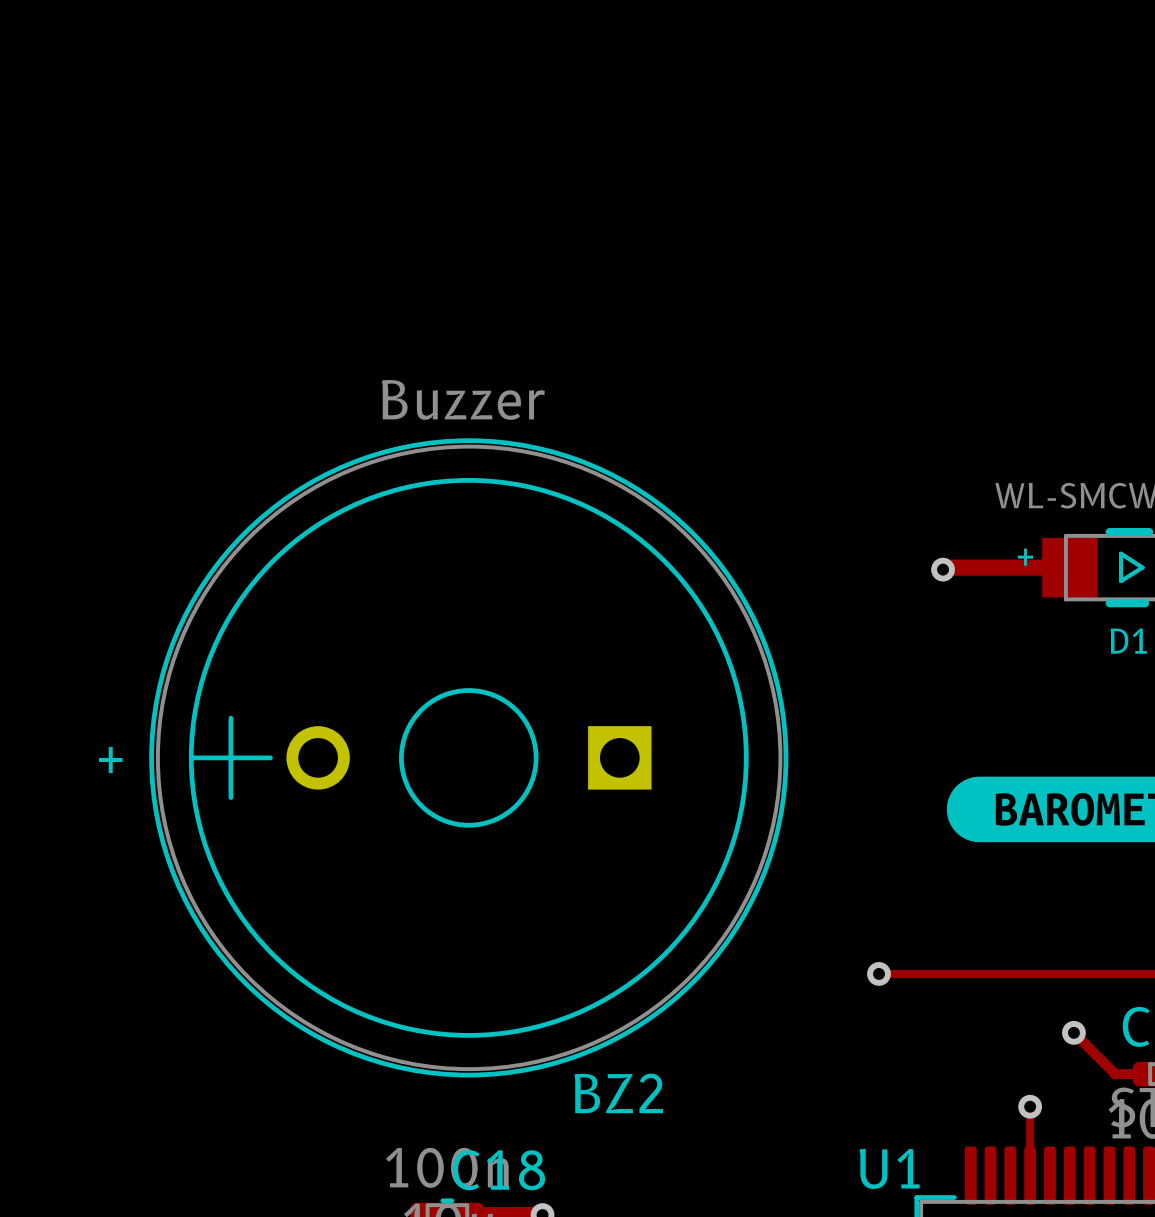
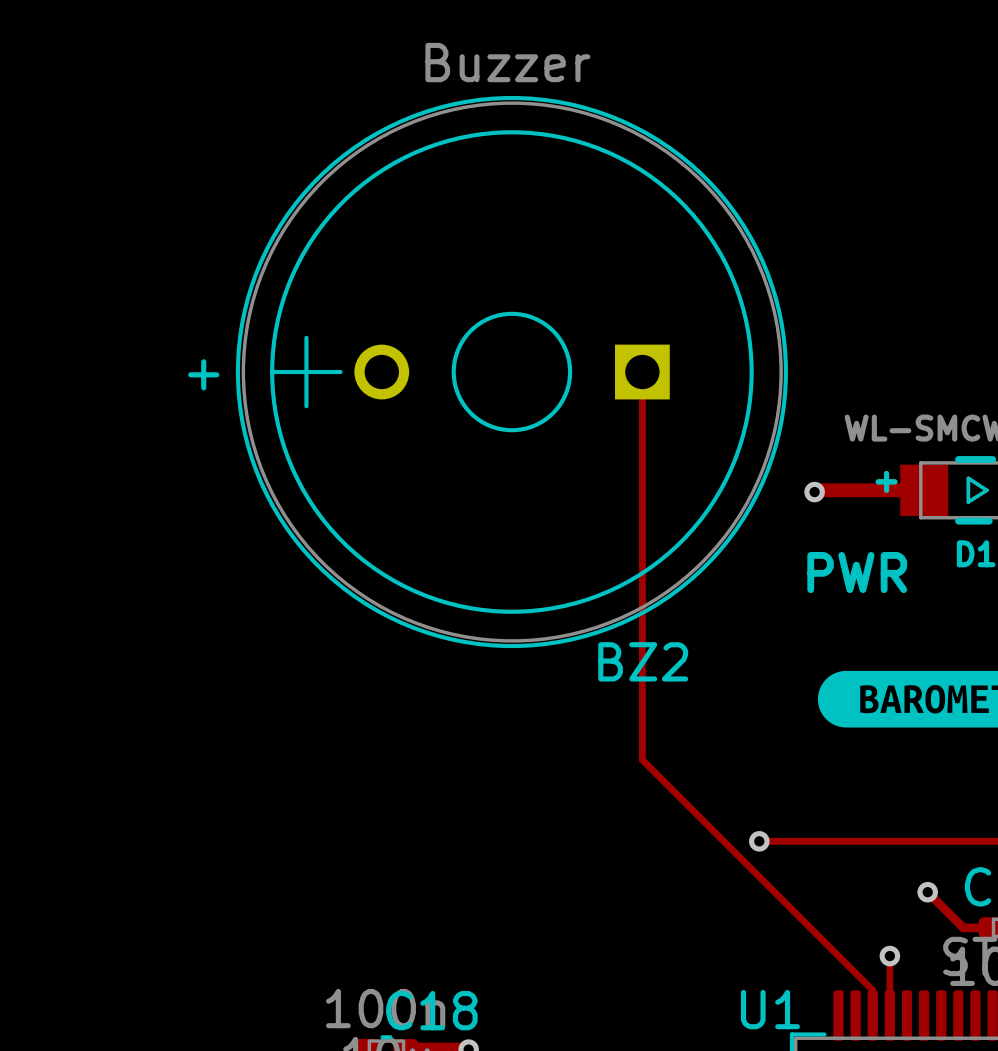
track: none -> (642, 372) (642, 759) (872, 990) (872, 1015)
text: none -> PWR (857, 572)
BZ2 position: (468, 757) -> (511, 372)

